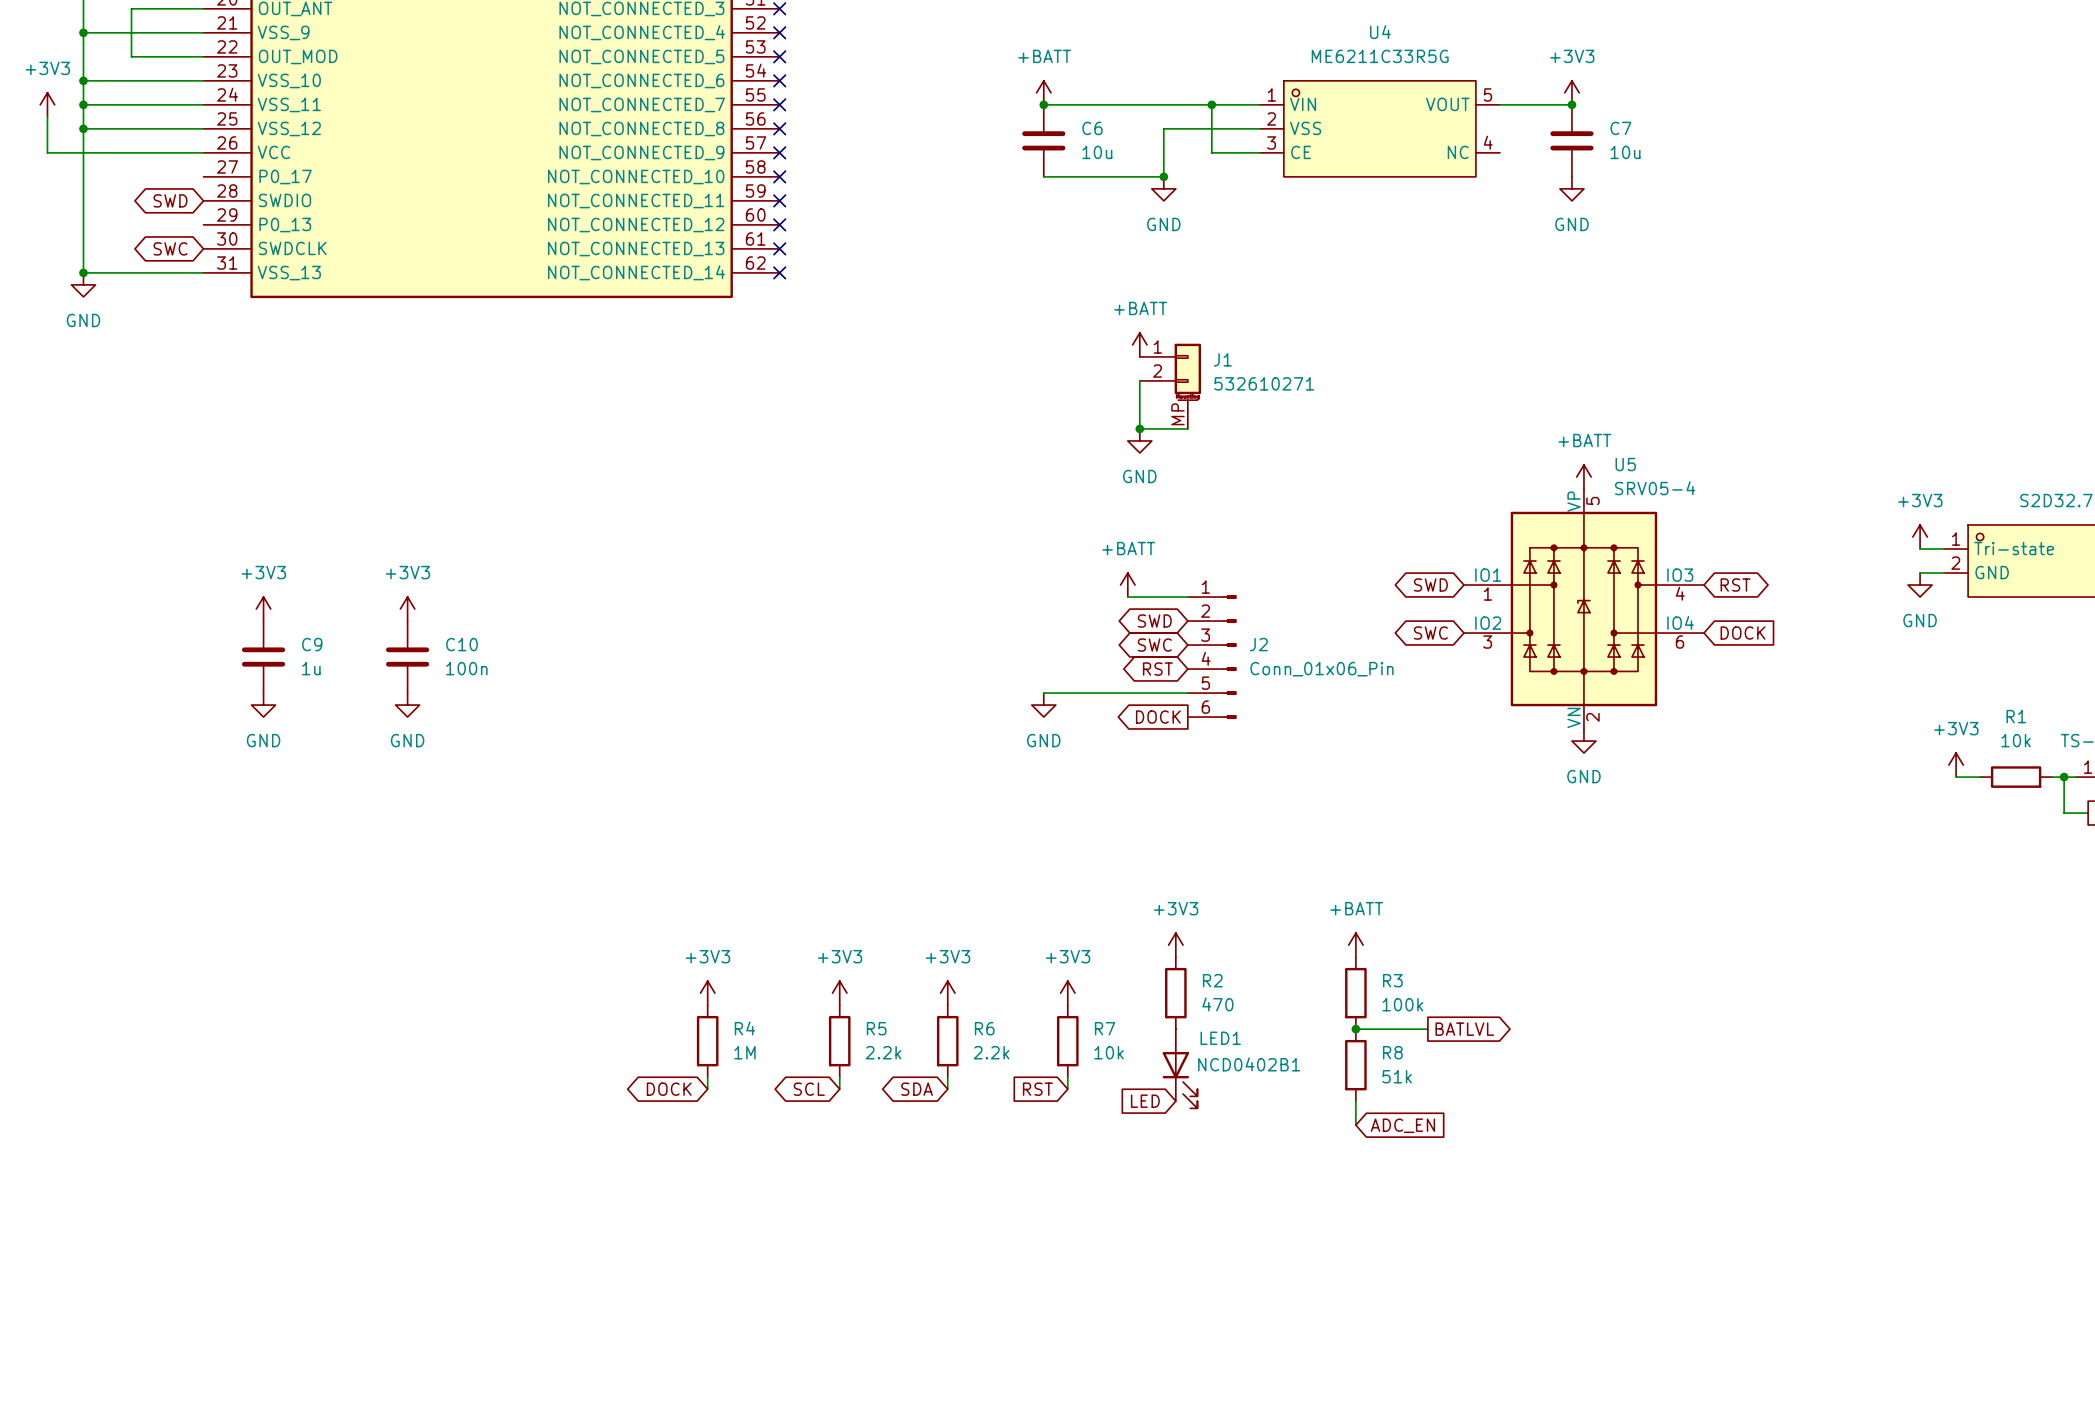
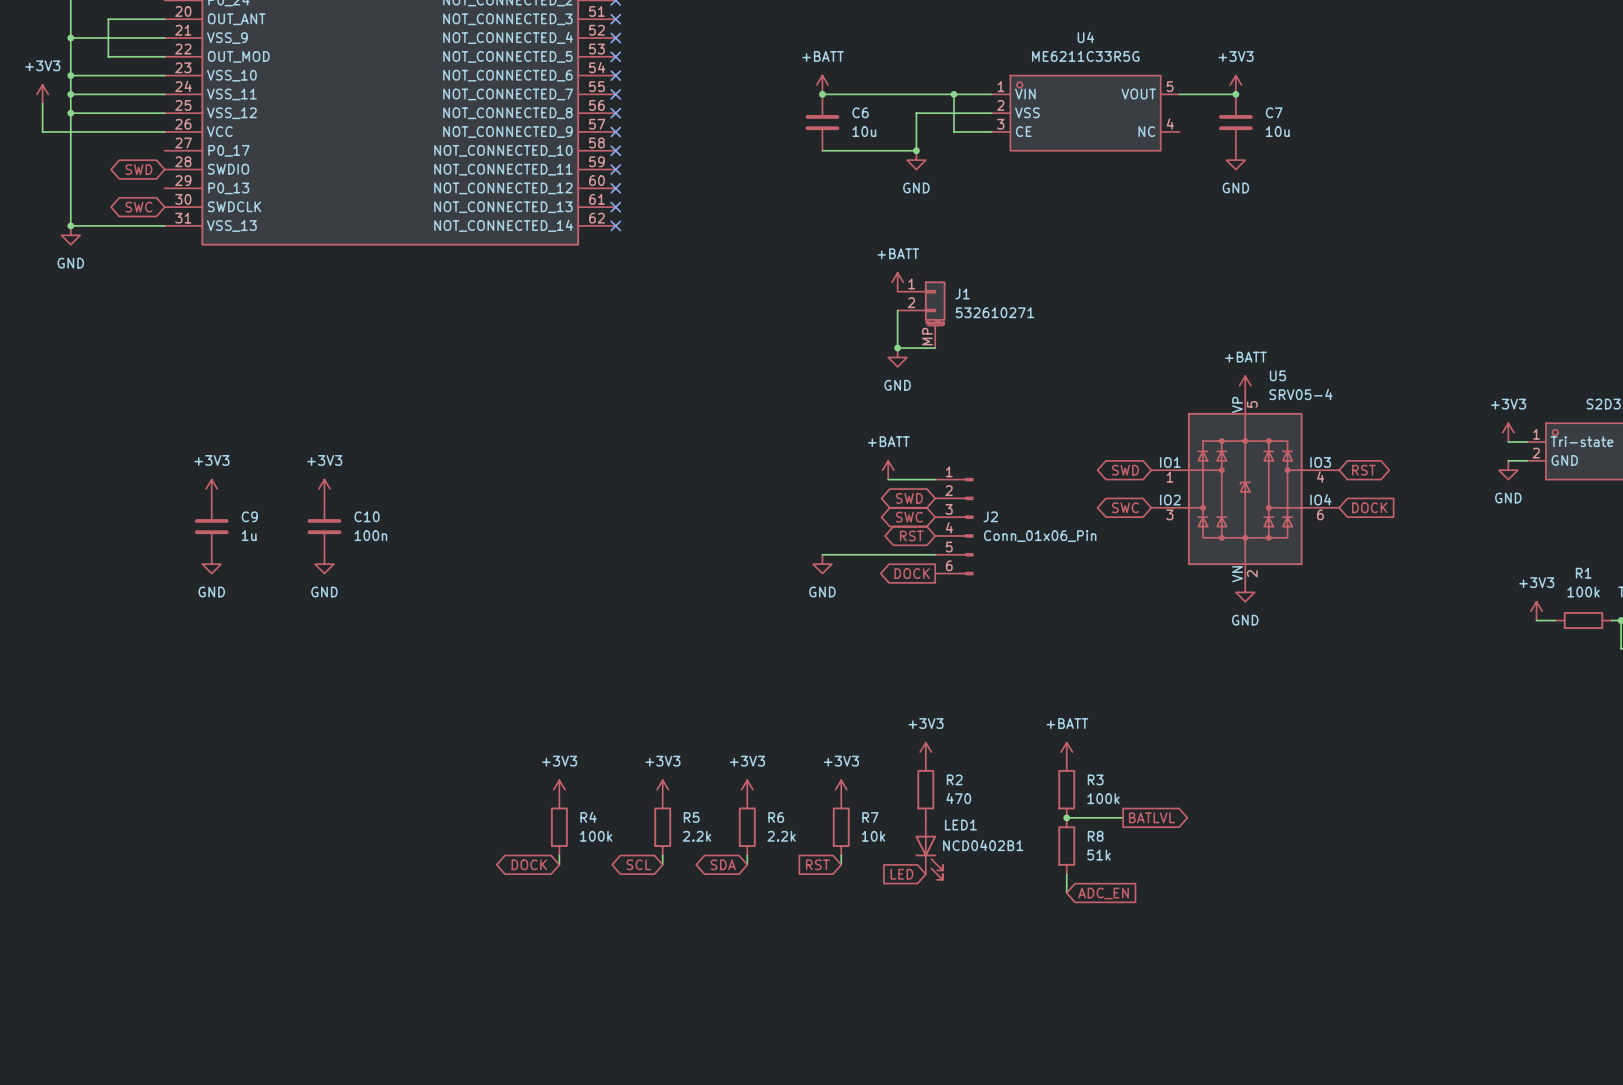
R1 value: 10k (2016, 740) -> 100k (1583, 592)
R4 value: 1M (744, 1052) -> 100k (596, 836)

